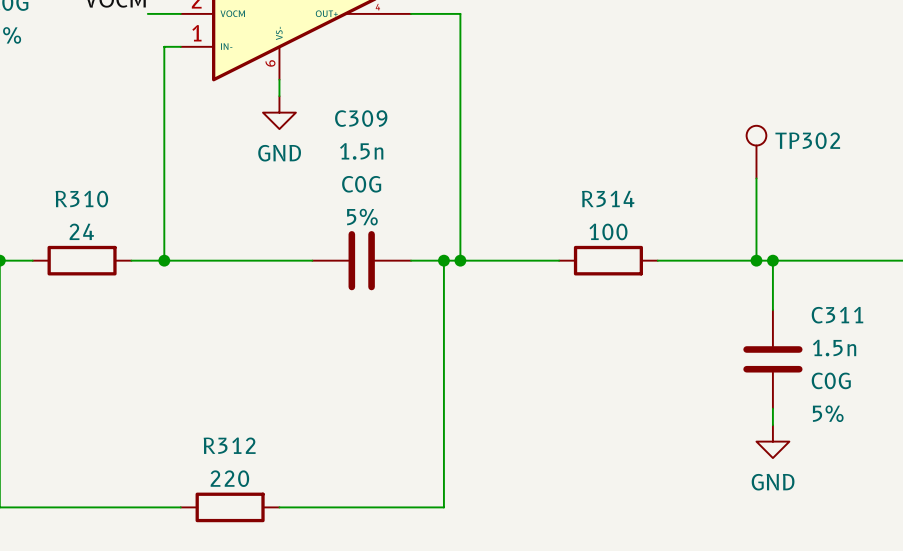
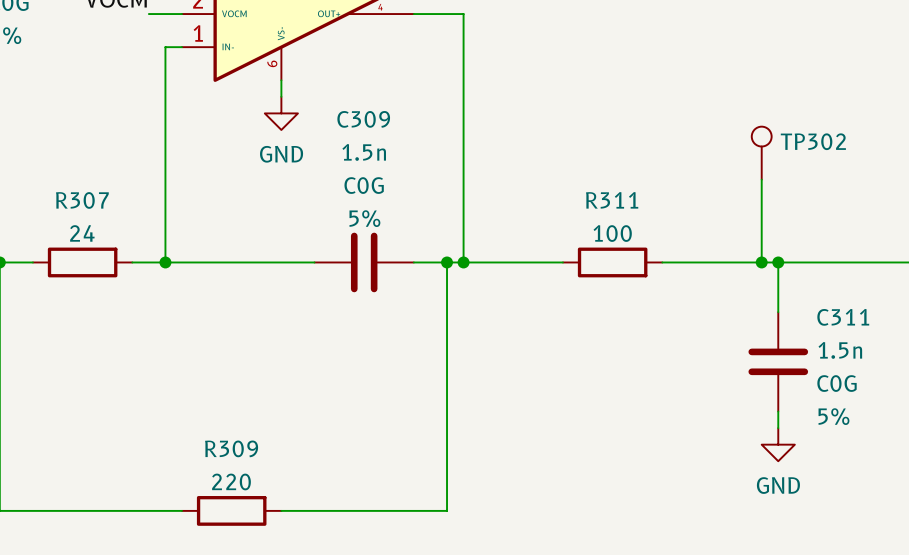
R314 name: R314 (608, 198) -> R311 (612, 200)
R310 name: R310 (81, 199) -> R307 (82, 200)
R312 name: R312 (229, 445) -> R309 (231, 448)

